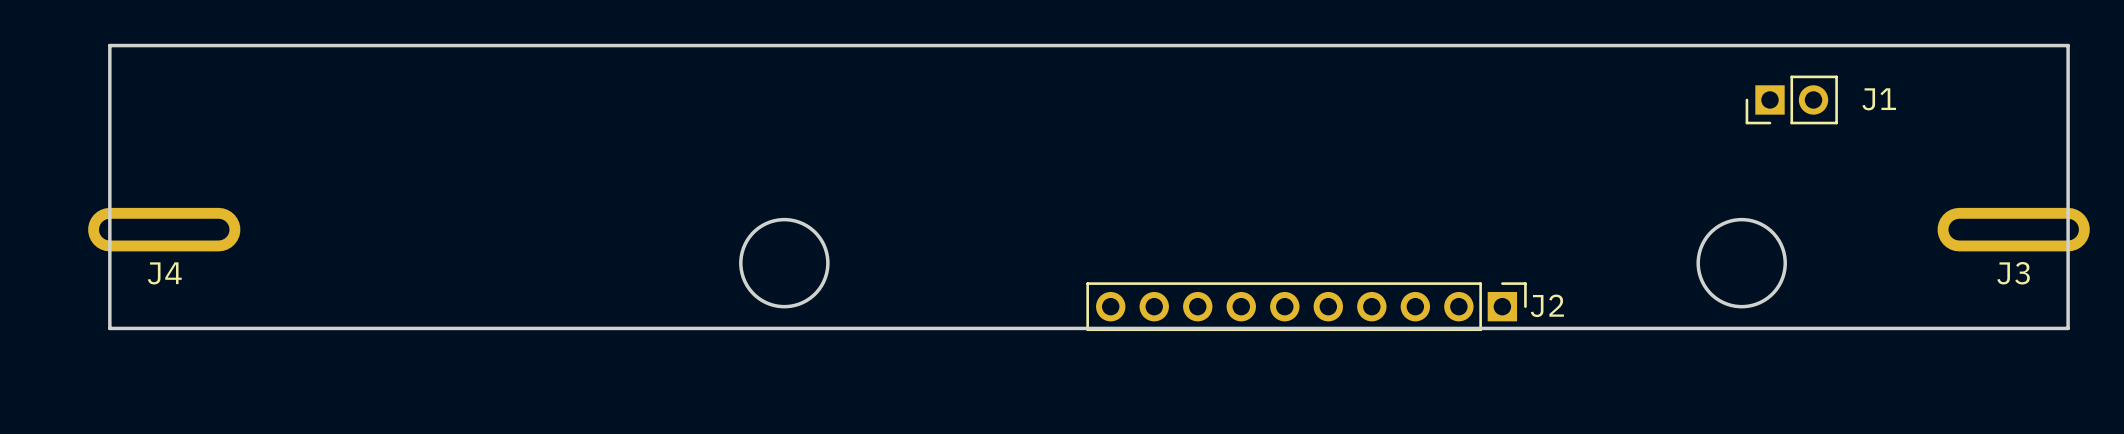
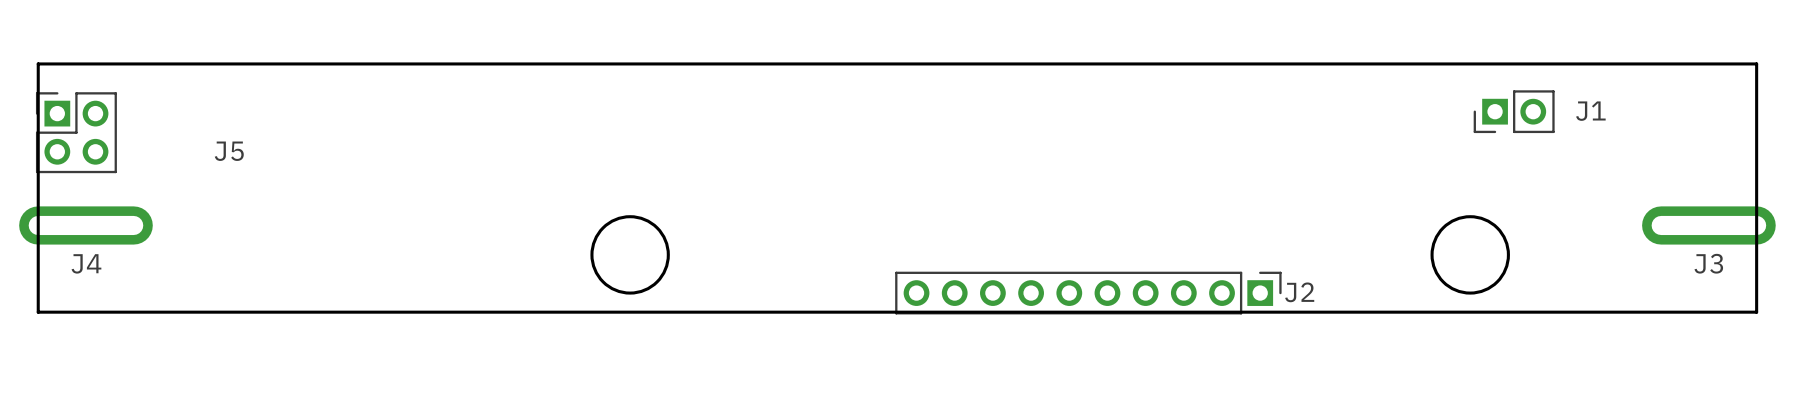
J5: none -> (76, 132)

